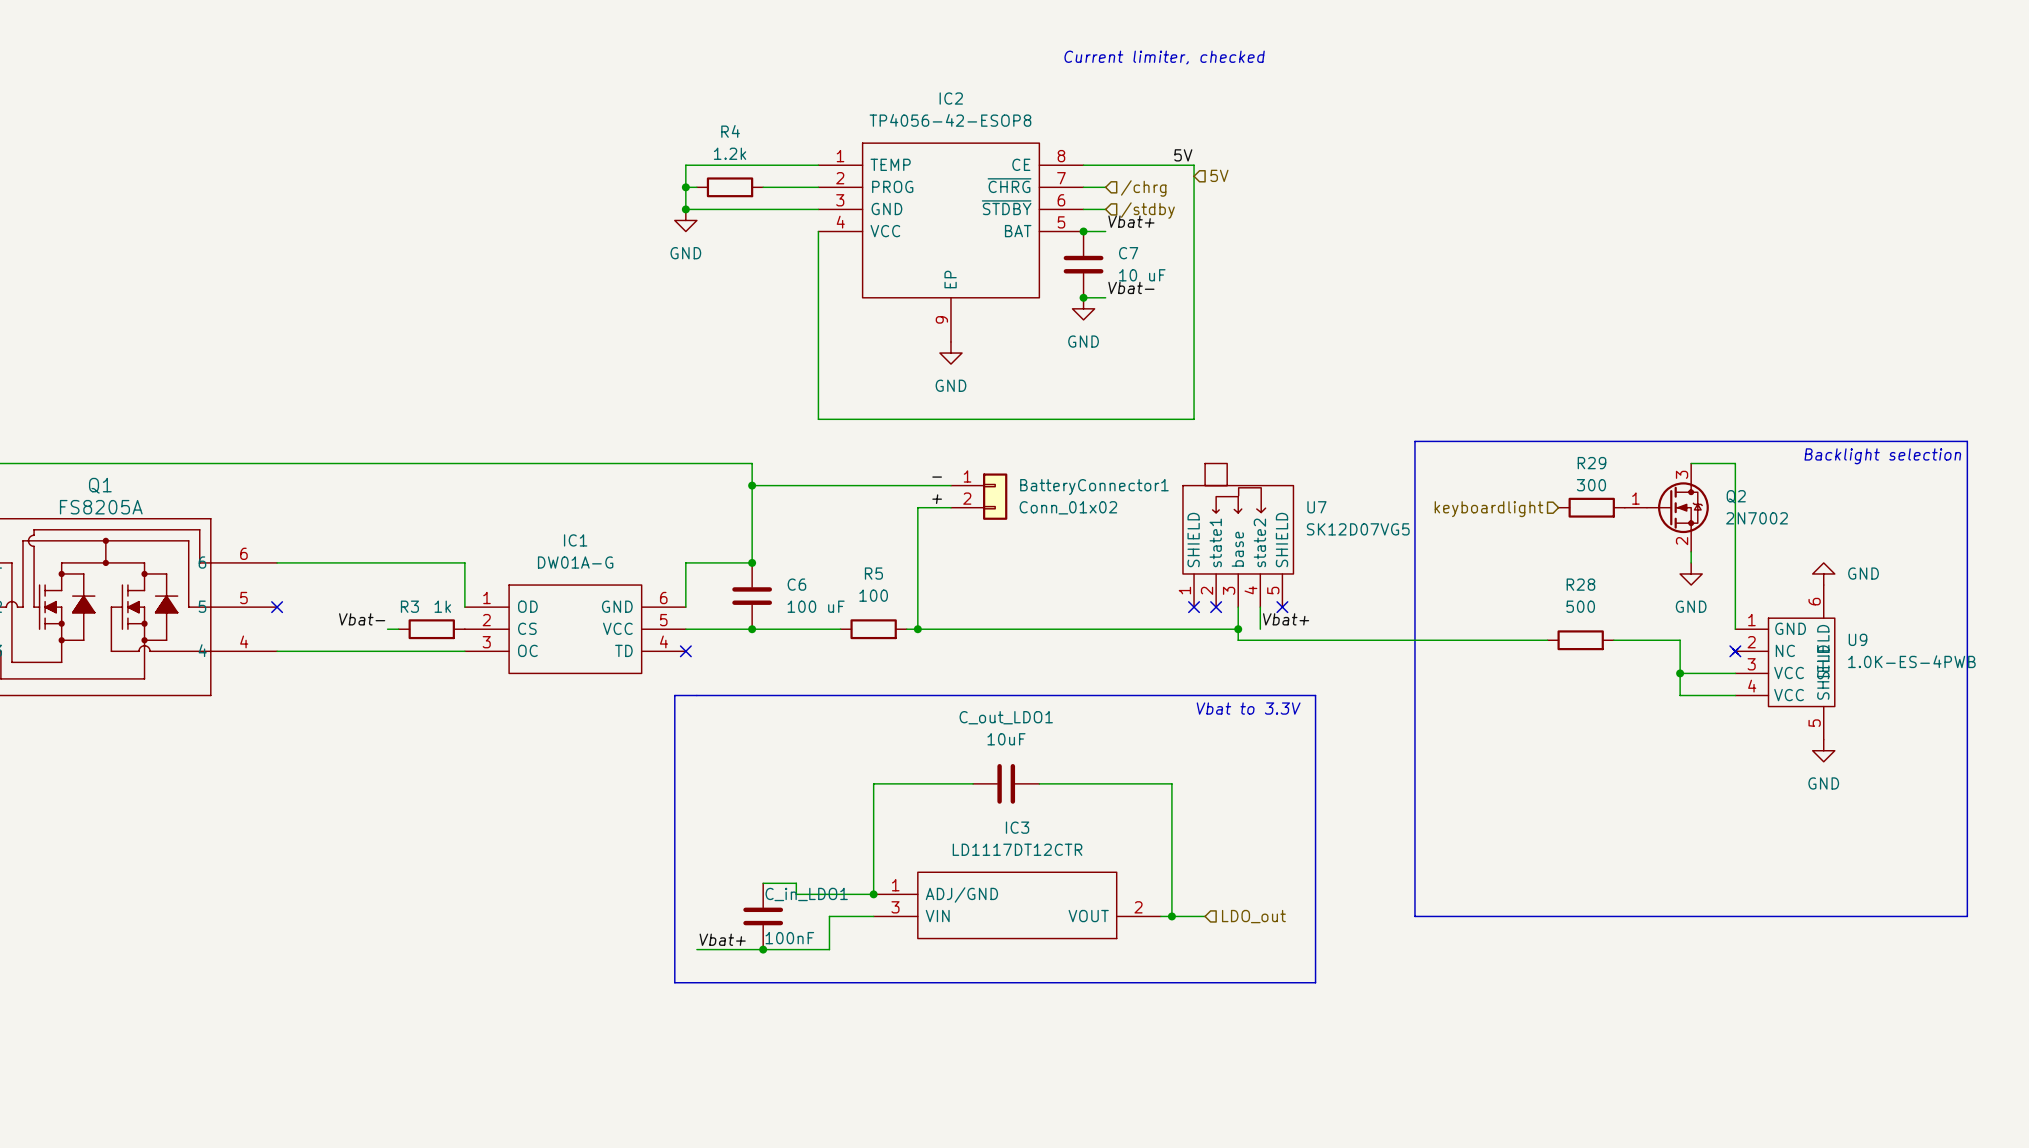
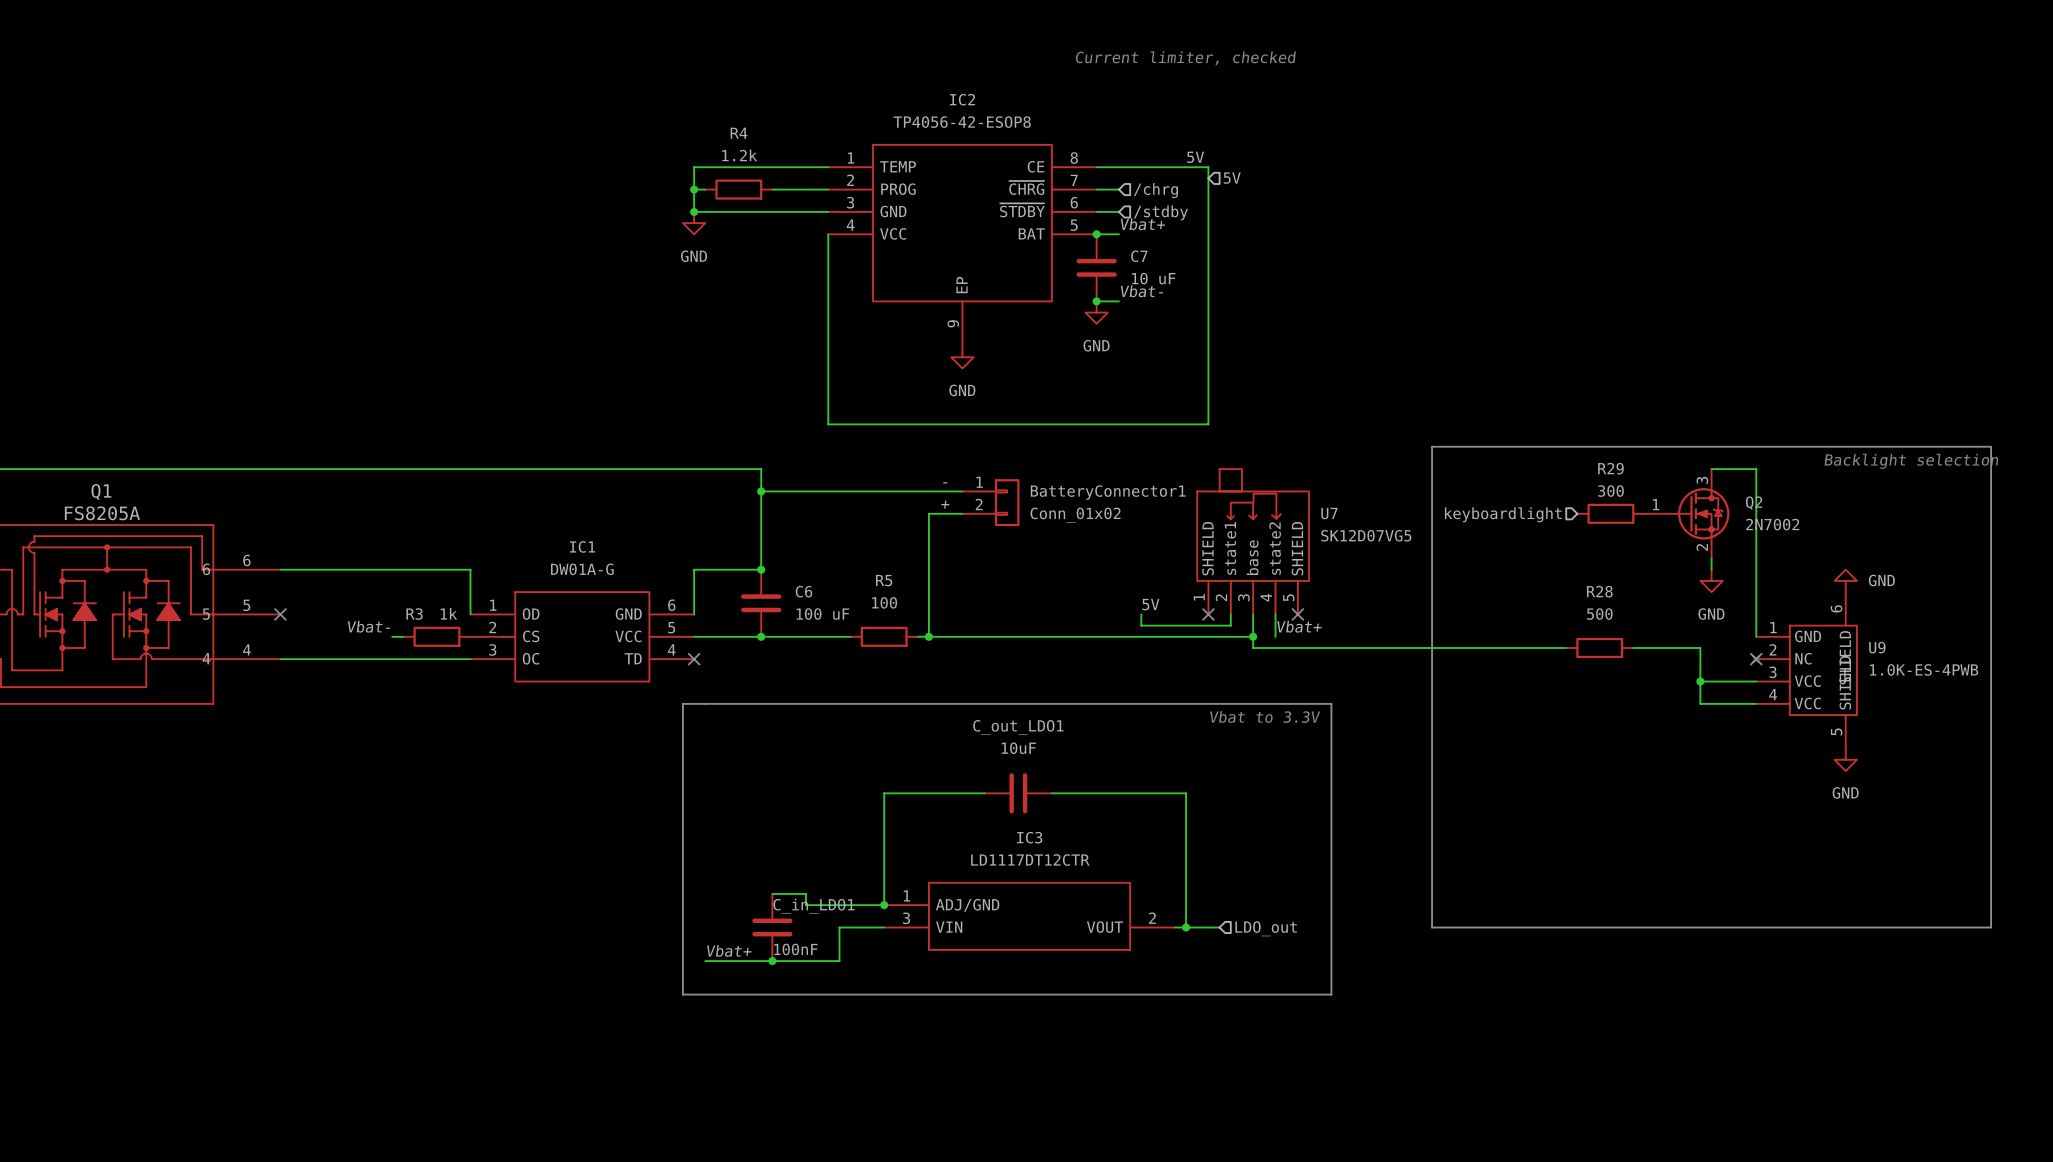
label: none -> 5V (1150, 604)
wire: none -> (1141, 614) (1141, 625) (1230, 625) (1230, 614)
no-connect mark: (1216, 607) -> none

